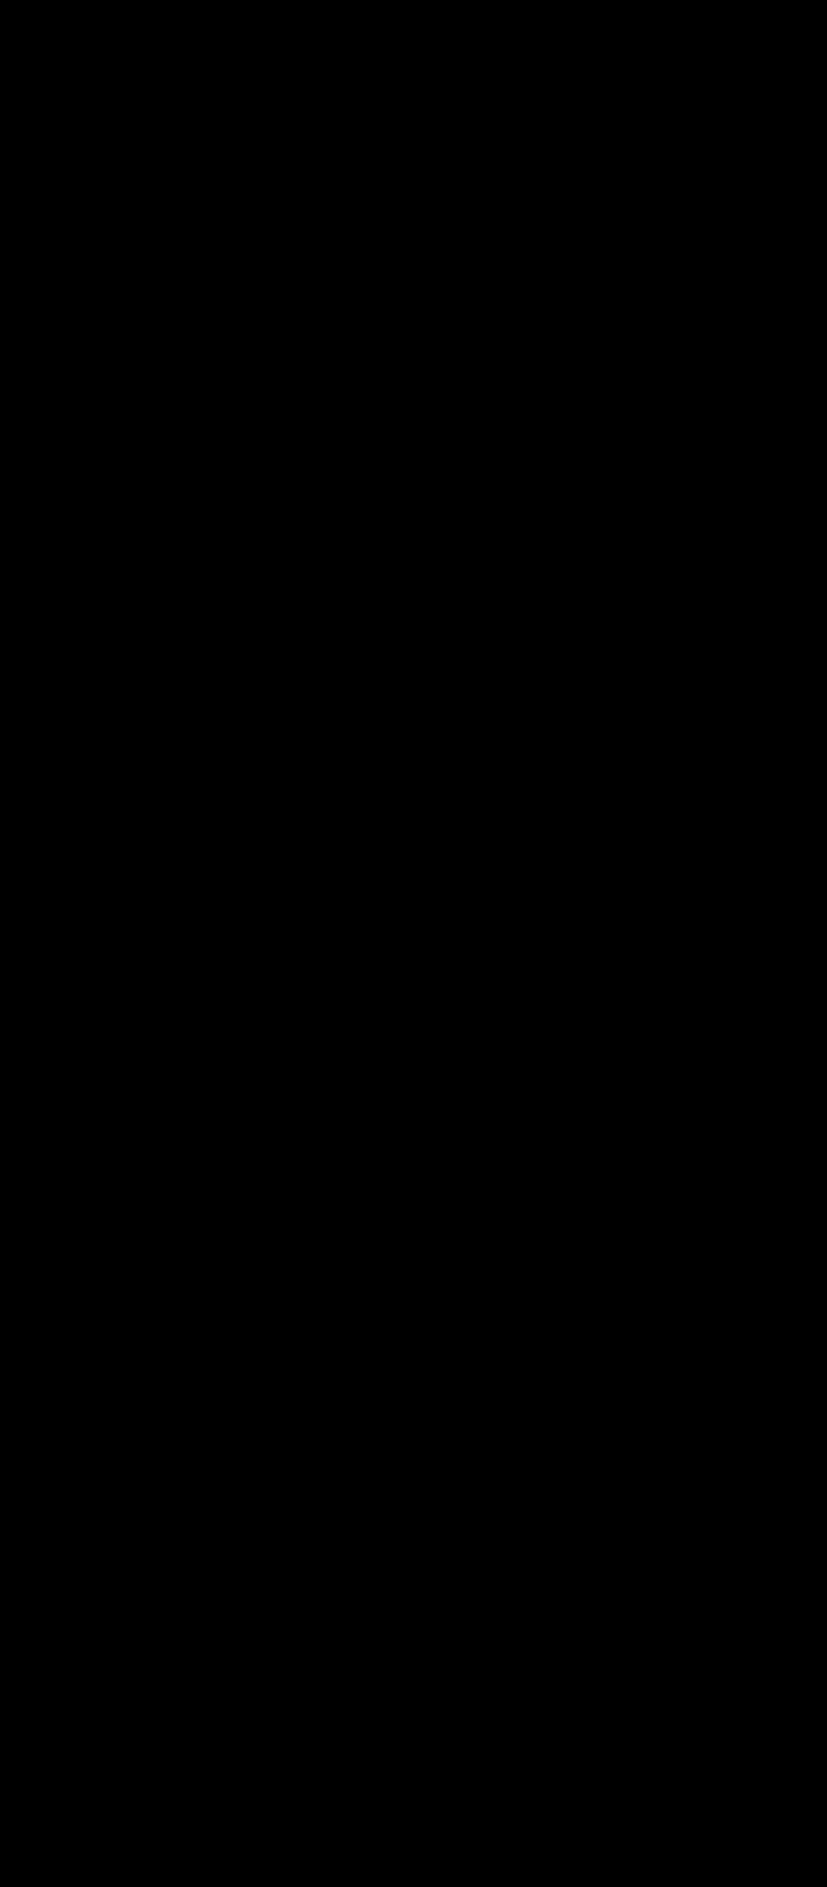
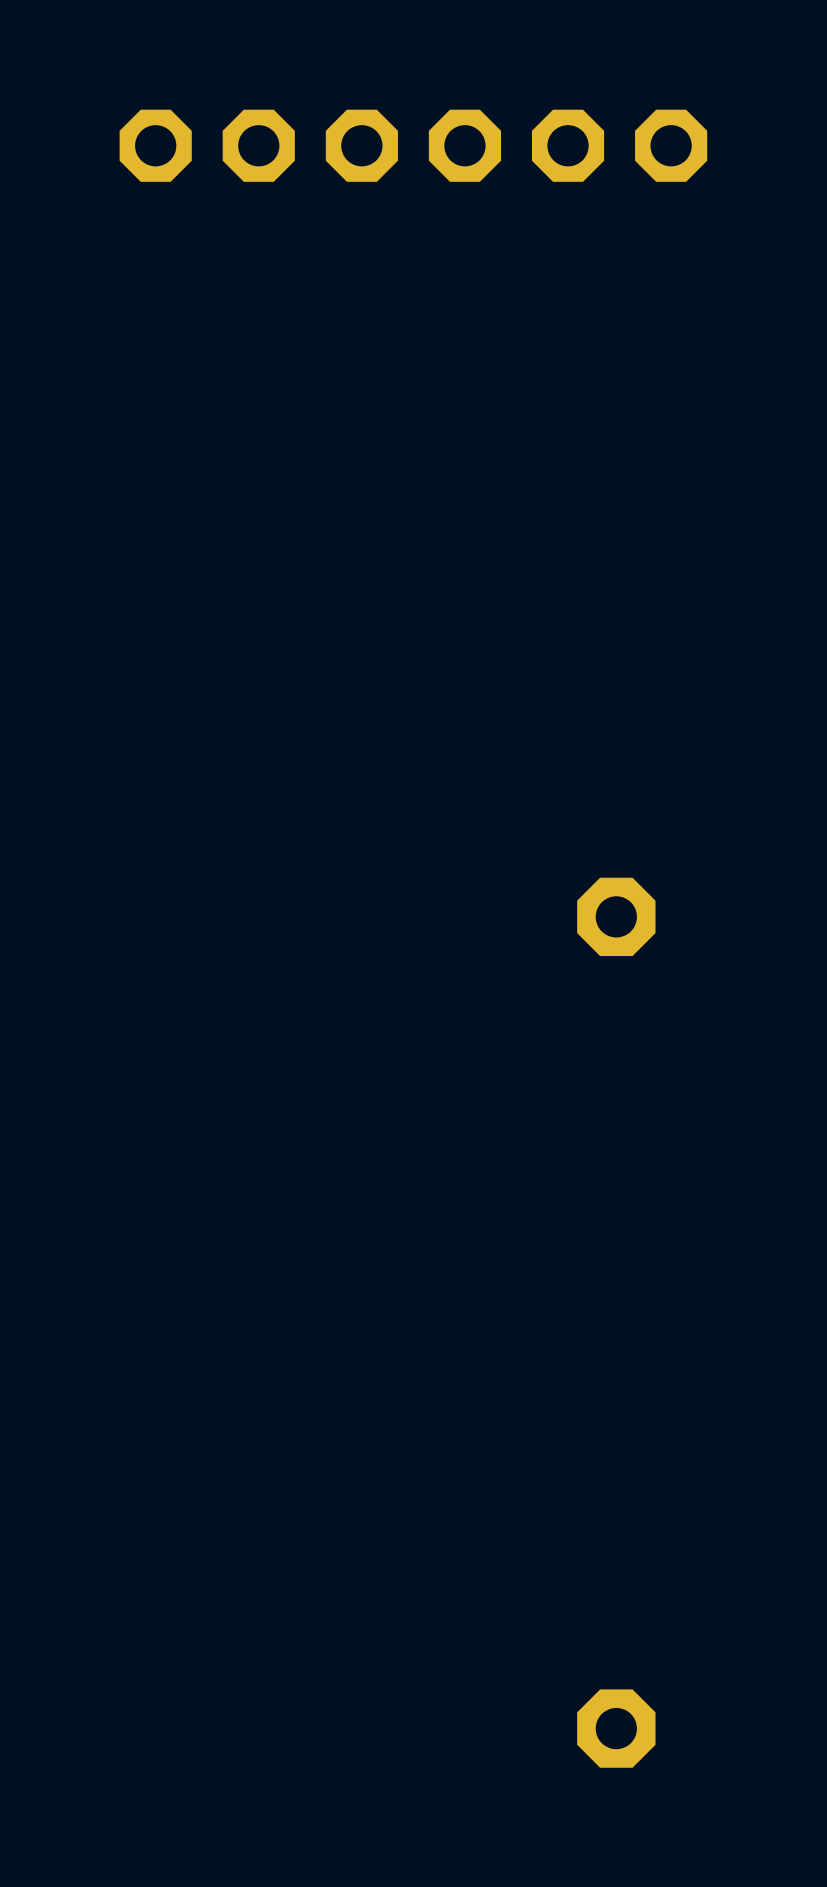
part: none -> (413, 145)
part: none -> (616, 916)
part: none -> (616, 1728)

